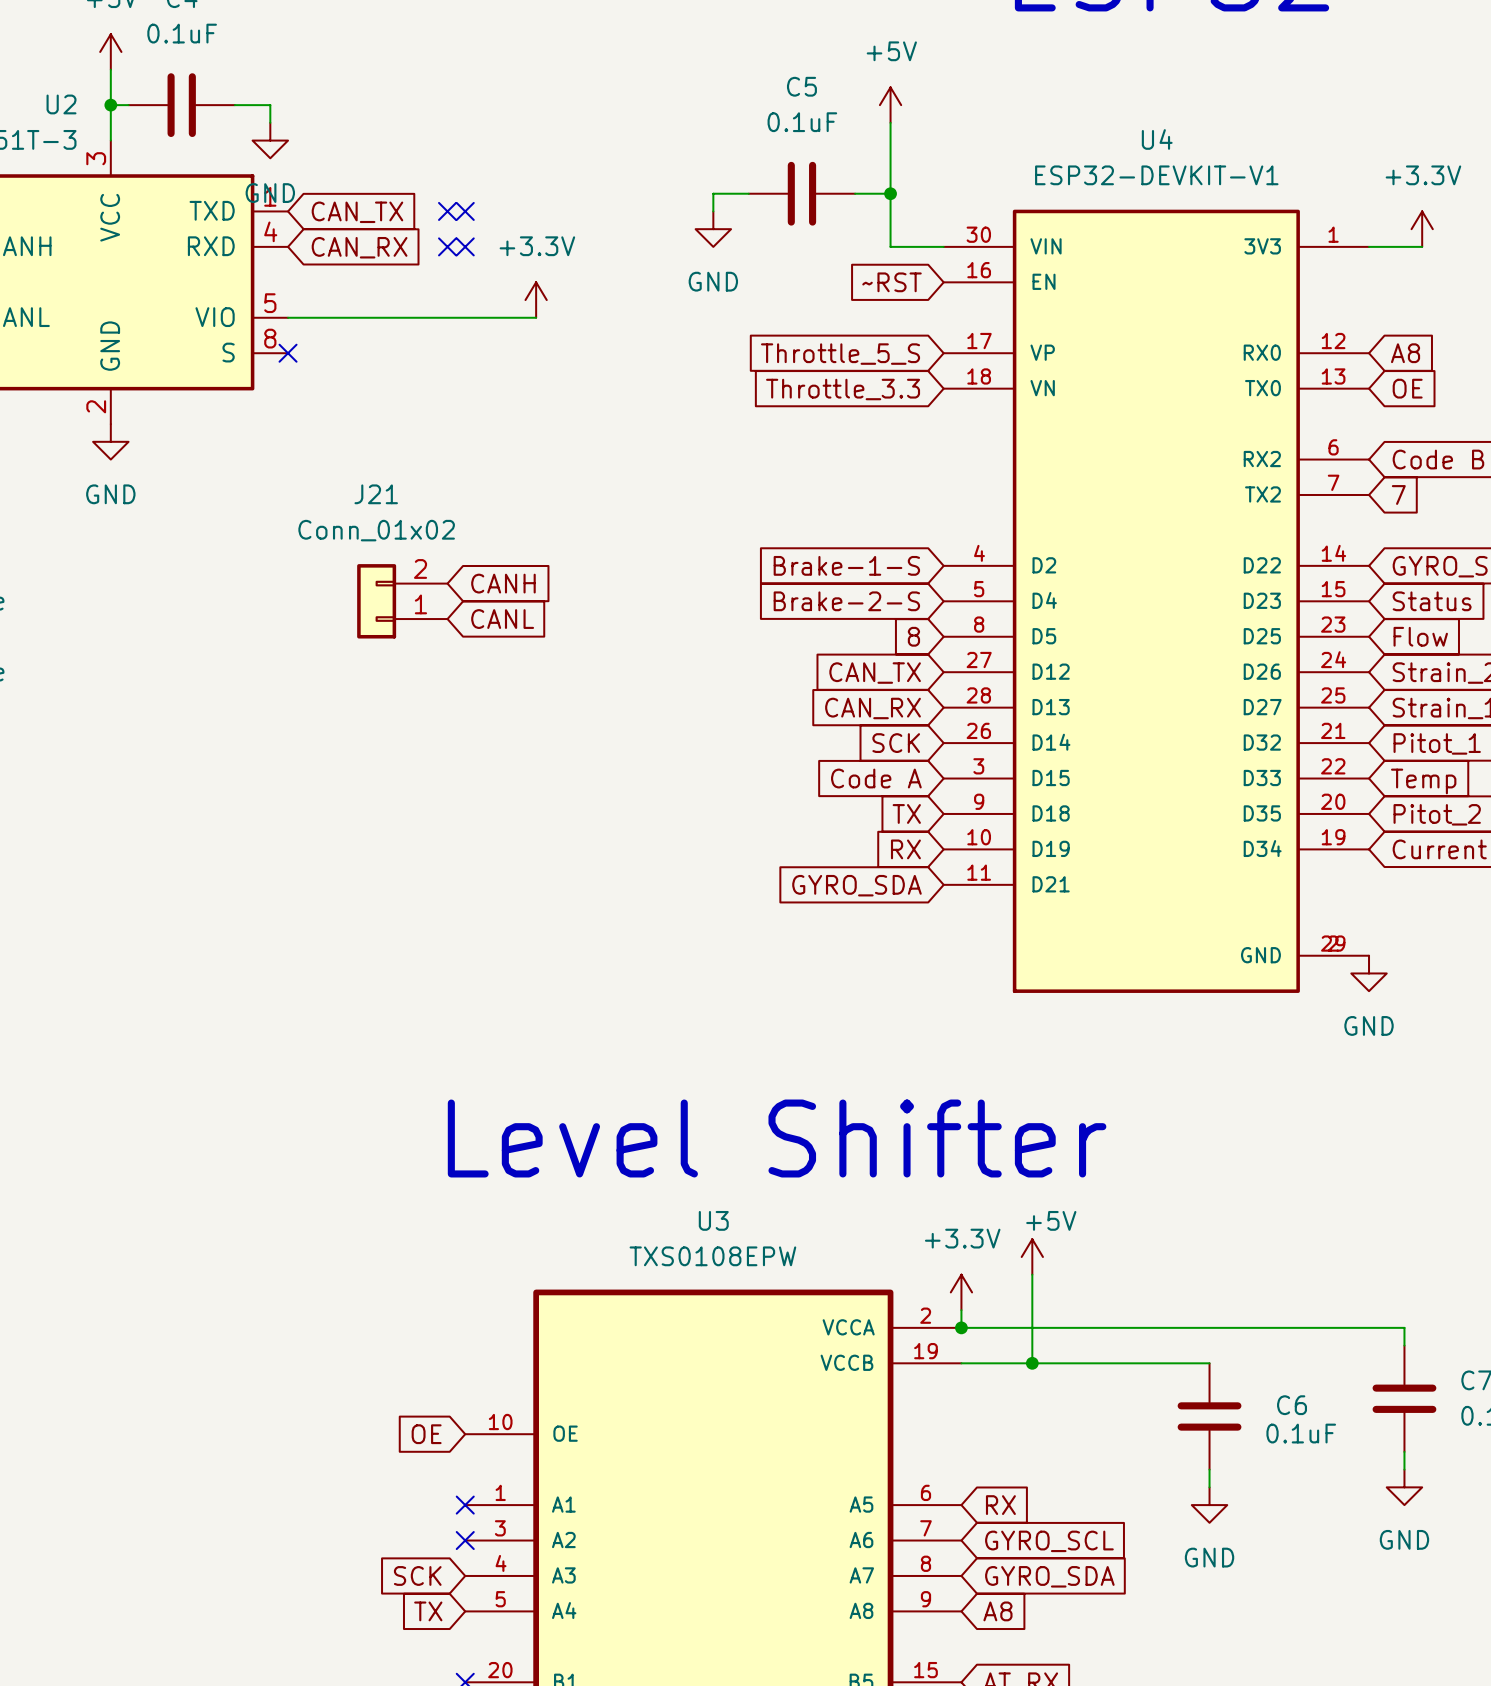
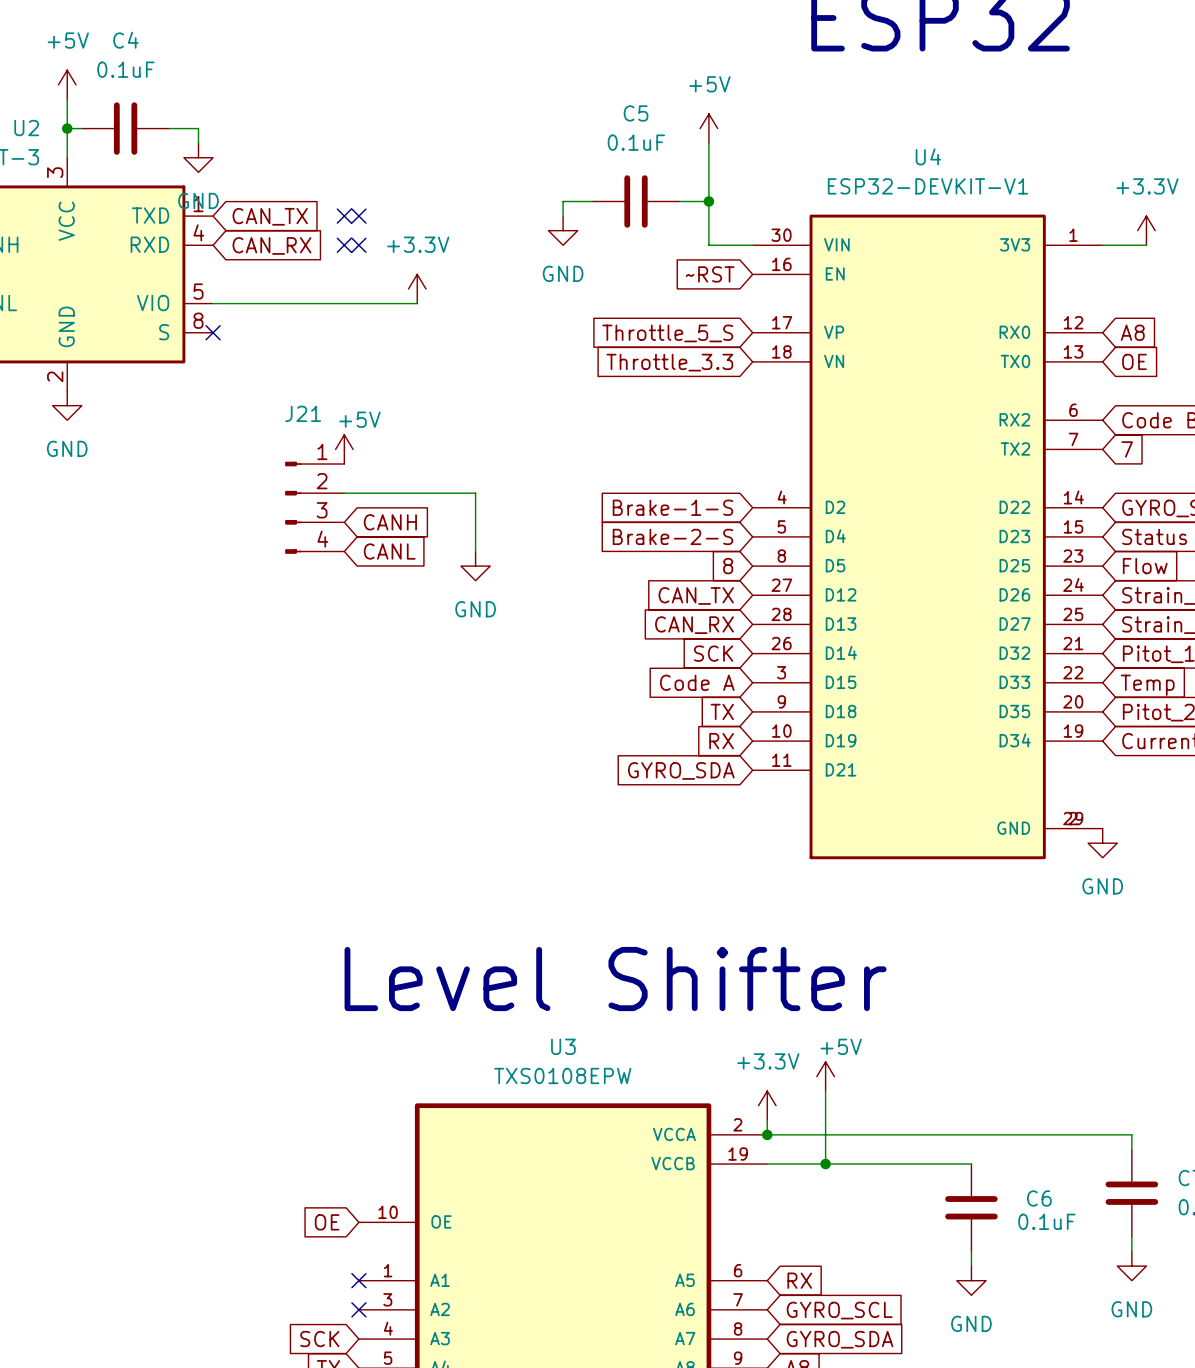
power symbol: none -> +5V (344, 449)
J21 value: Conn_01x02 (376, 530) -> none
wire: none -> (344, 493) (475, 493) (475, 551)
J21 symbol: [357, 564, 448, 639] -> [285, 461, 345, 554]
power symbol: none -> GND (475, 566)

